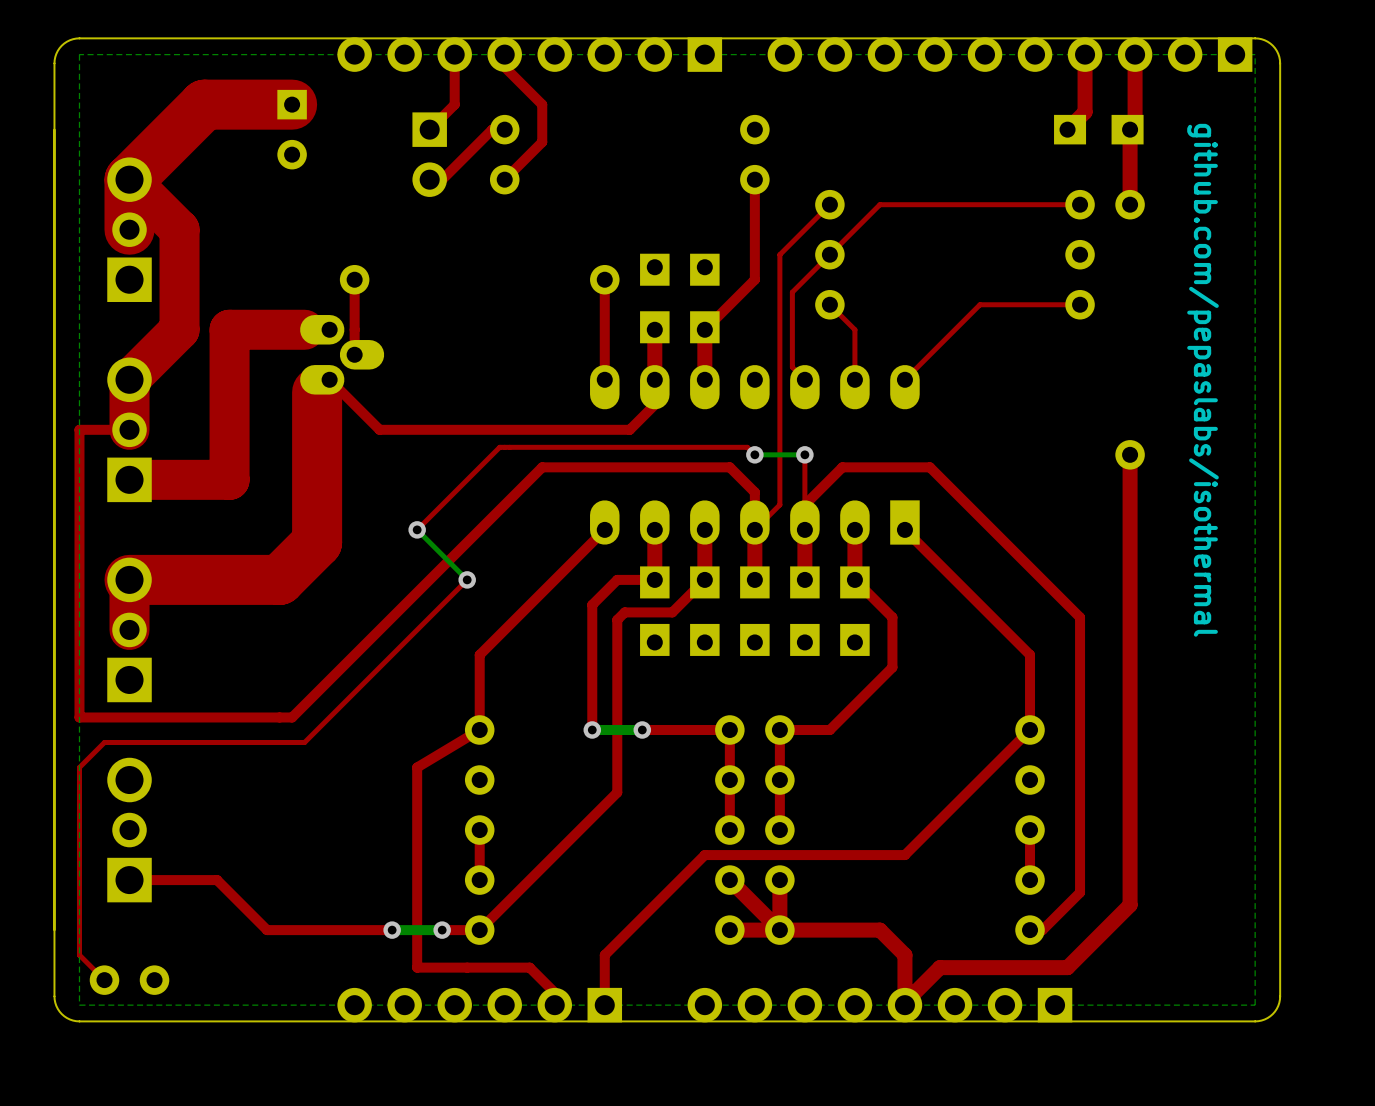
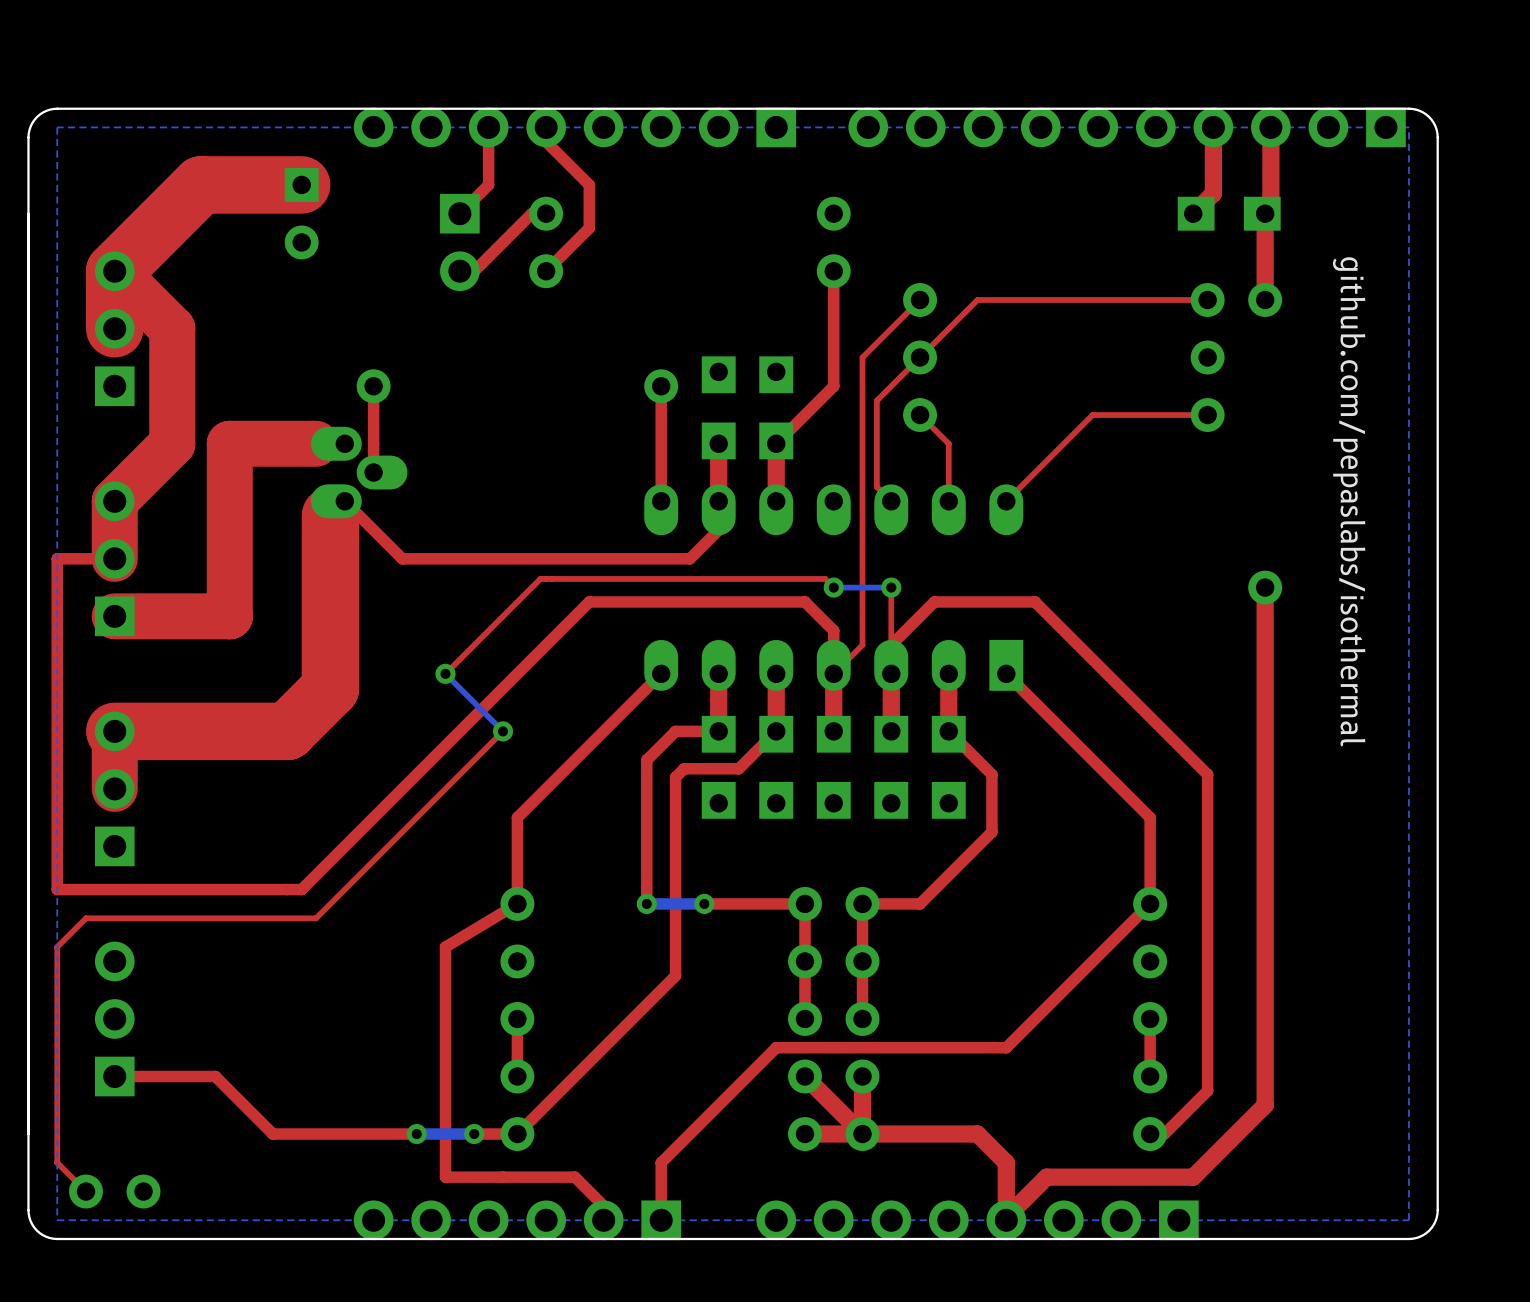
part footprint: [107, 157, 152, 303] -> [94, 251, 135, 407]
part footprint: [107, 357, 152, 503] -> [94, 481, 135, 637]
part footprint: [107, 557, 152, 703] -> [94, 711, 135, 867]
part footprint: [107, 757, 152, 903] -> [94, 941, 135, 1097]

